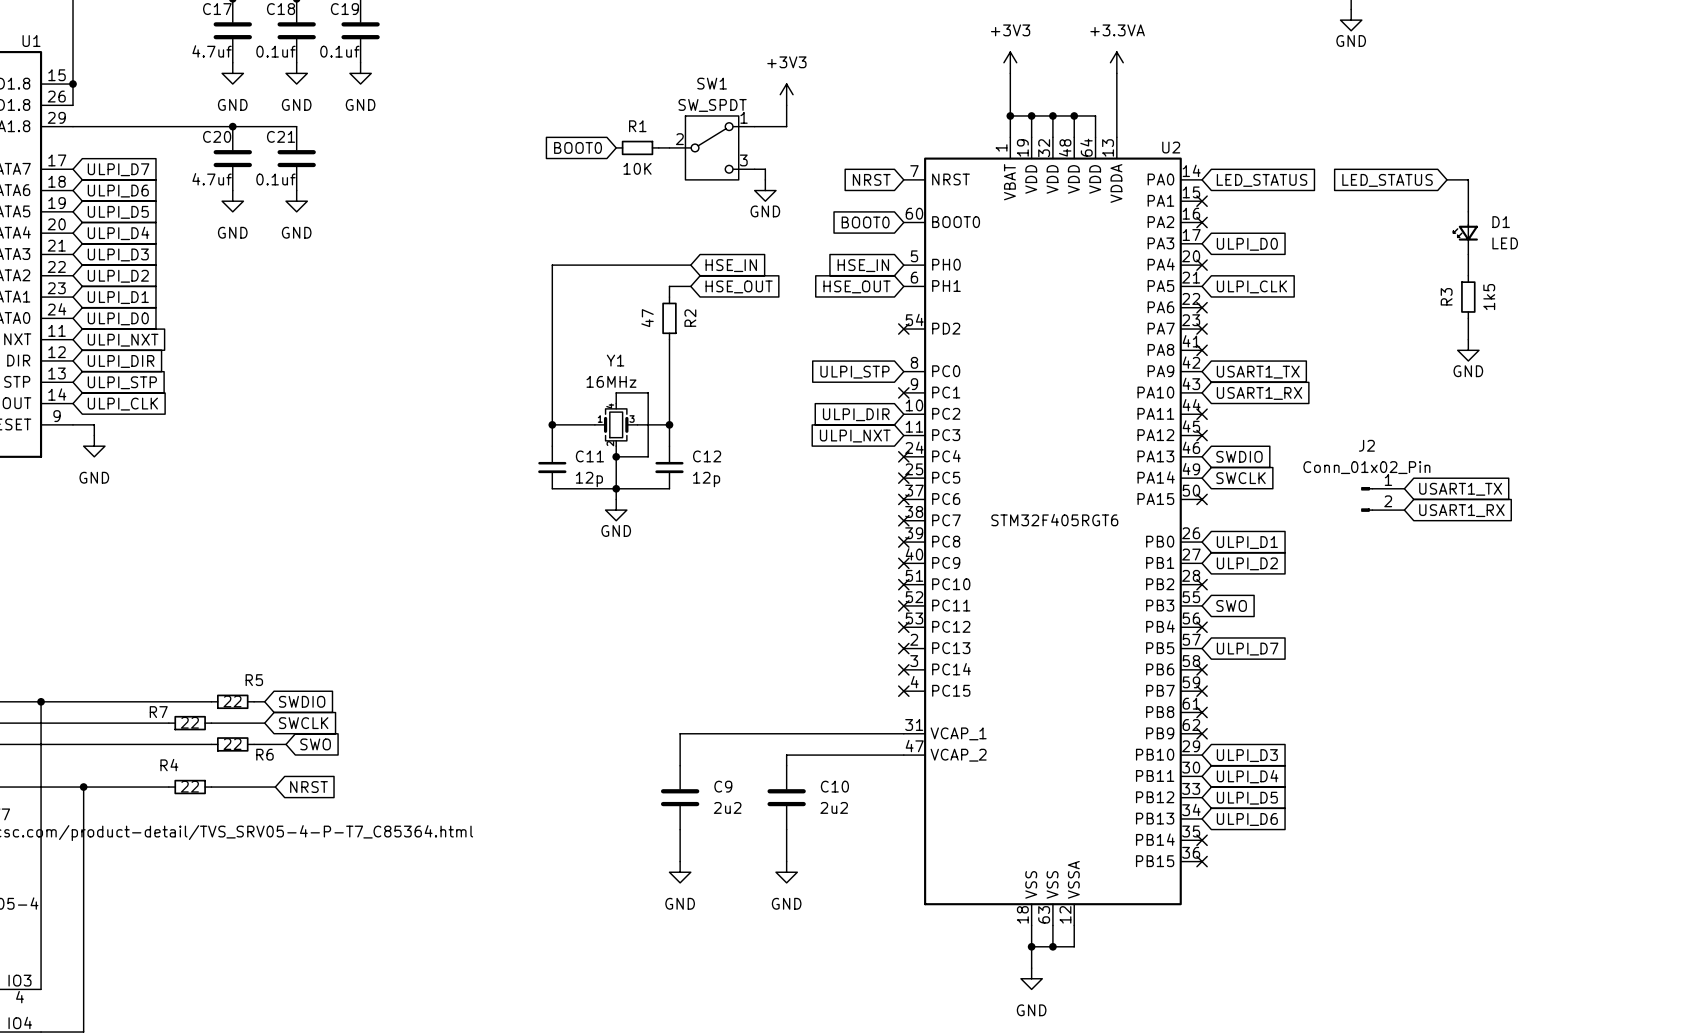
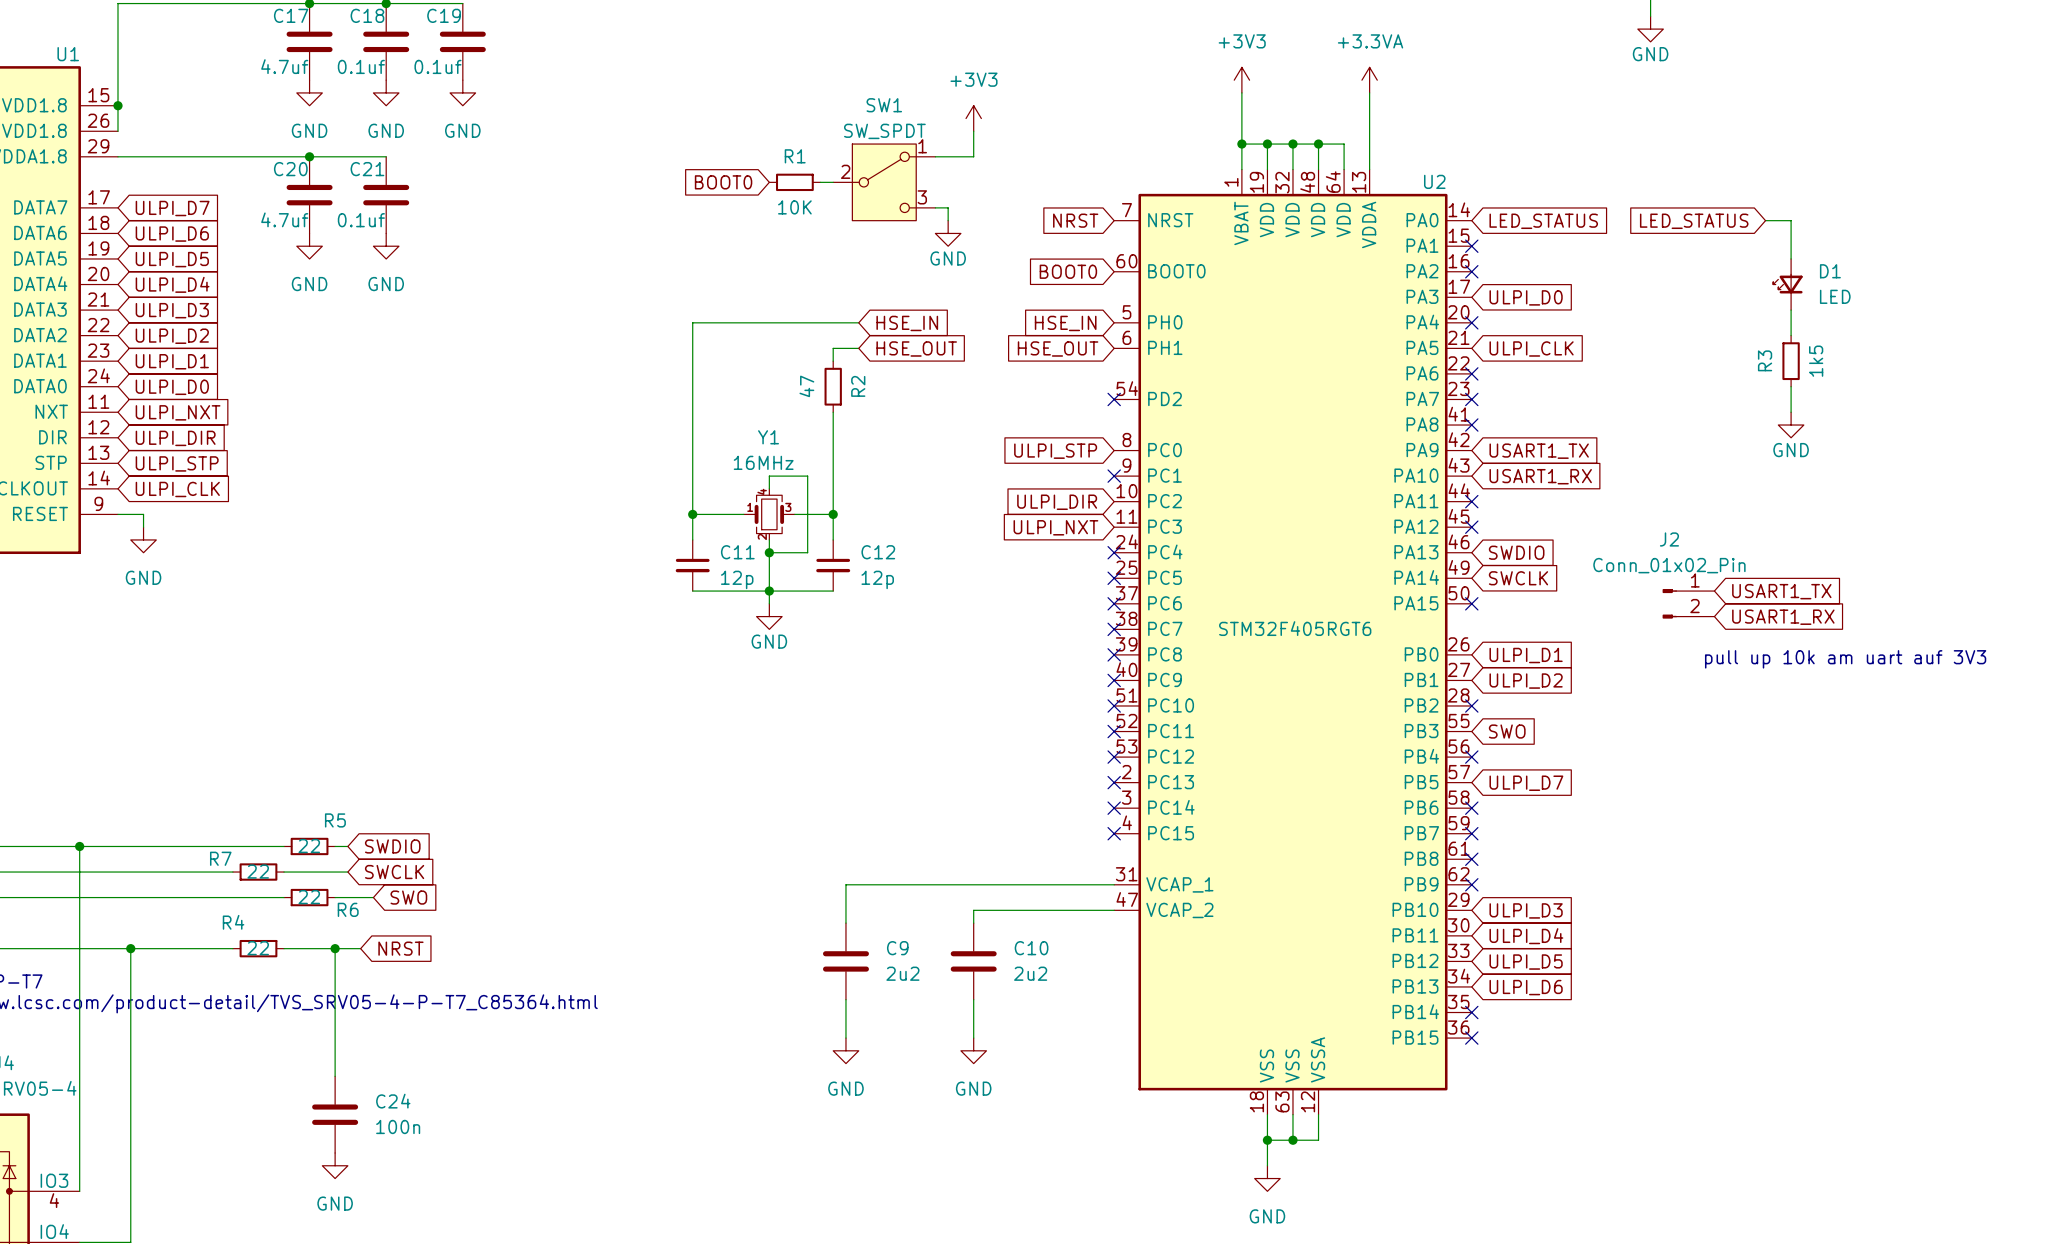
text: none -> pull up 10k am uart auf 3V3 (1845, 659)
wire: none -> (335, 948) (335, 1076)
junction: none -> (335, 948)
C24: none -> 100n (335, 1114)
power symbol: none -> GND (335, 1165)

